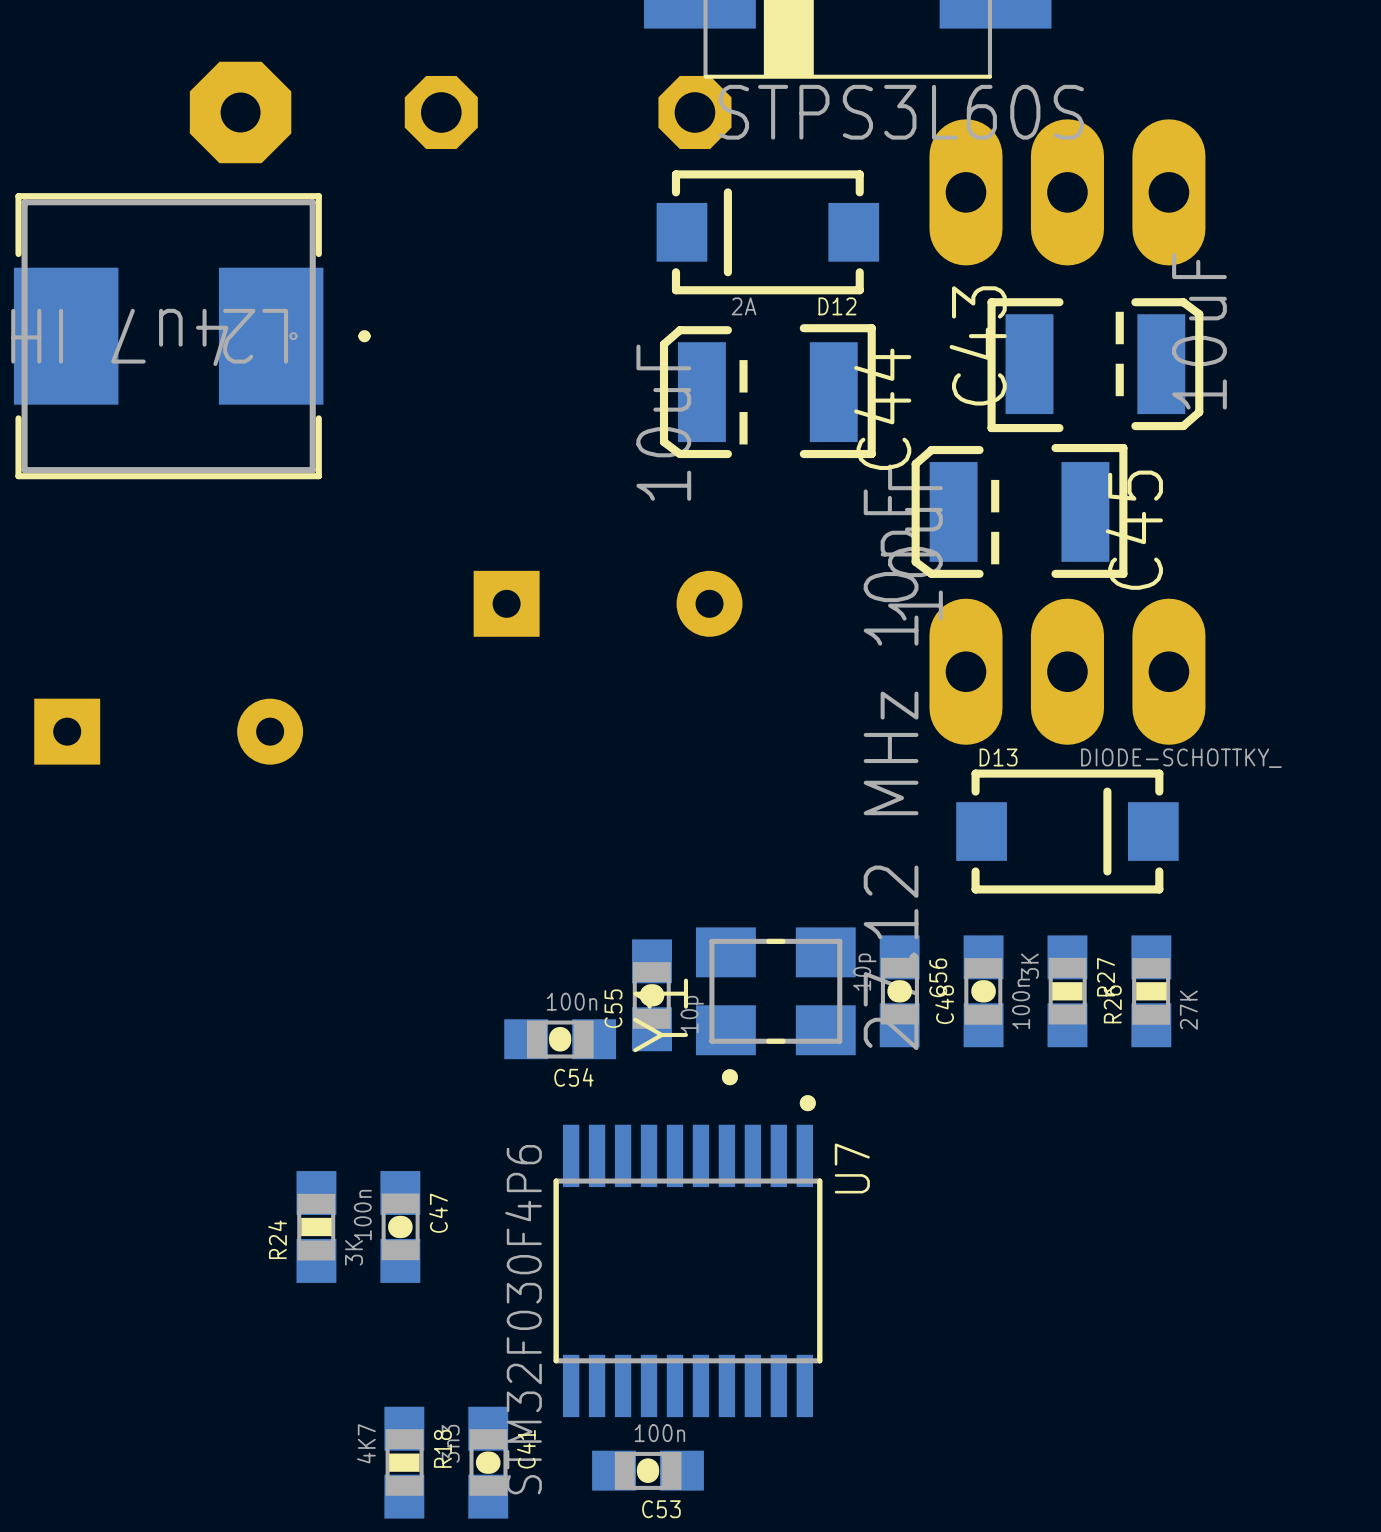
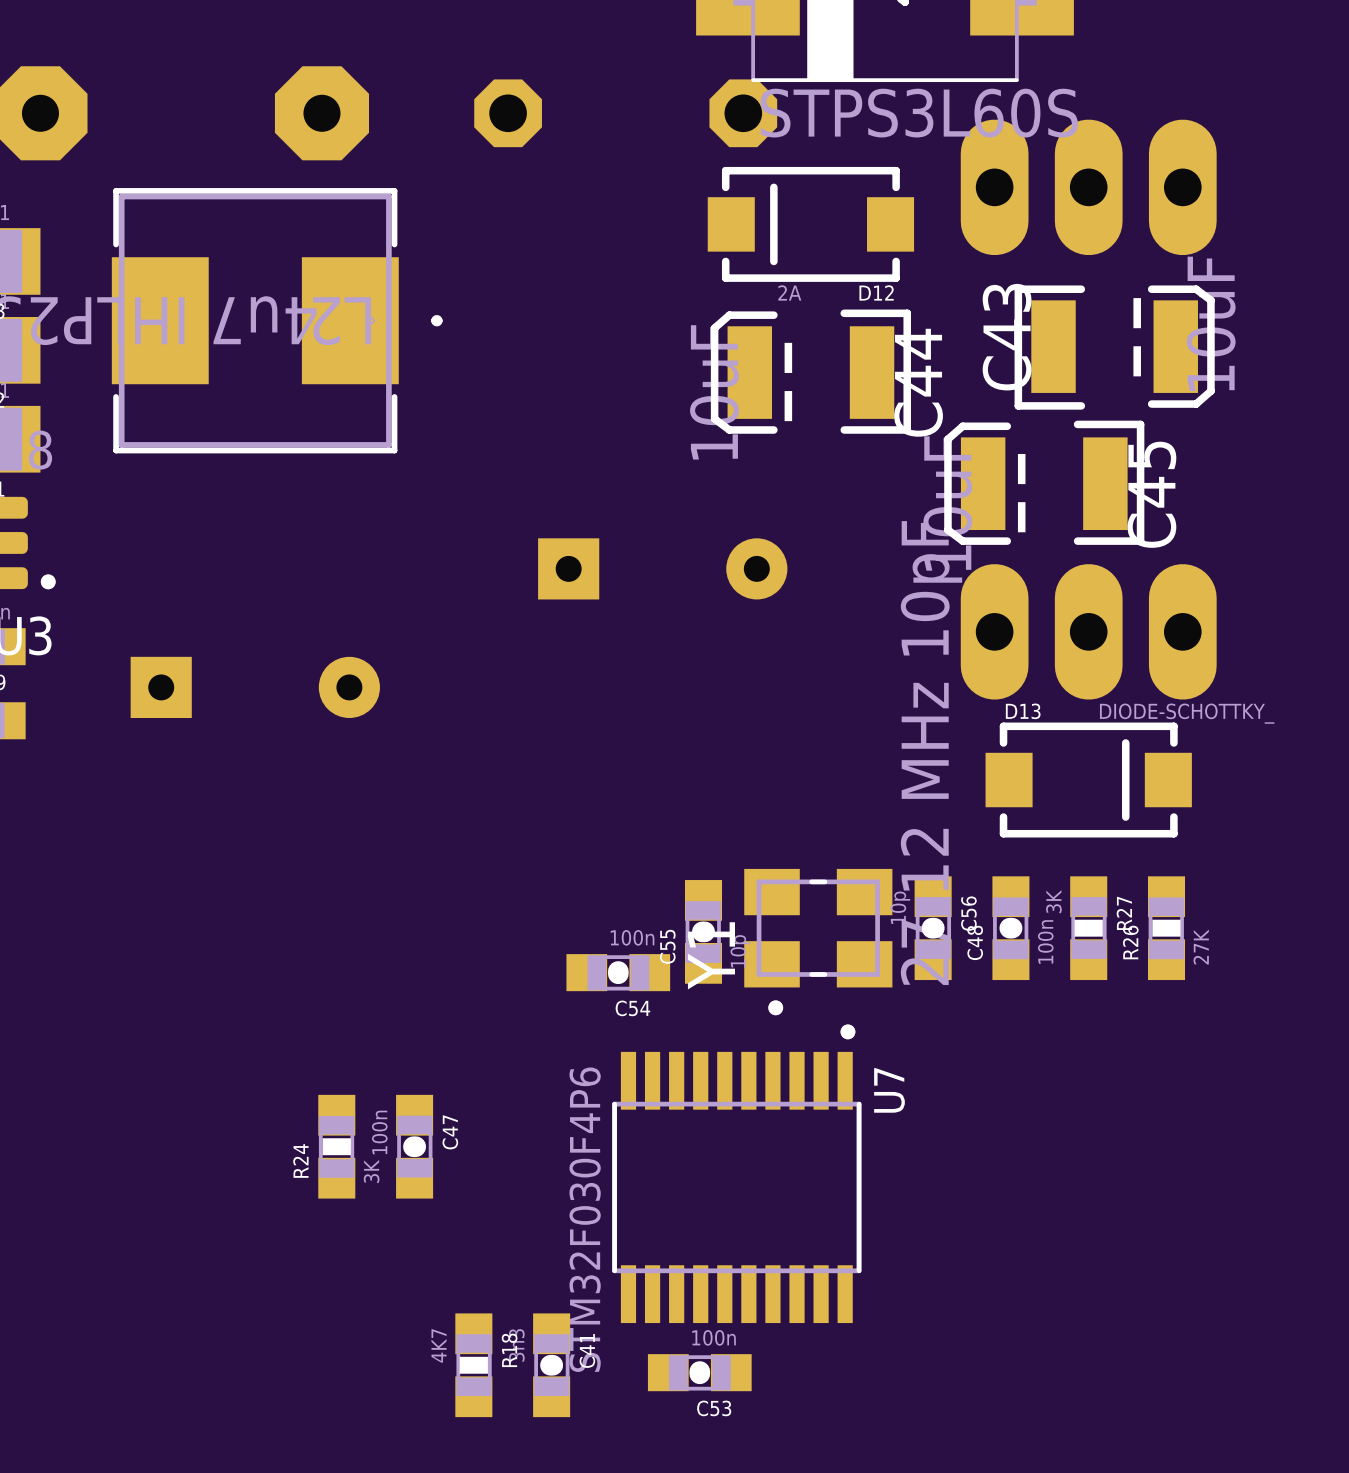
R24 position: (316, 1226) -> (336, 1146)
C47 position: (400, 1226) -> (414, 1146)

